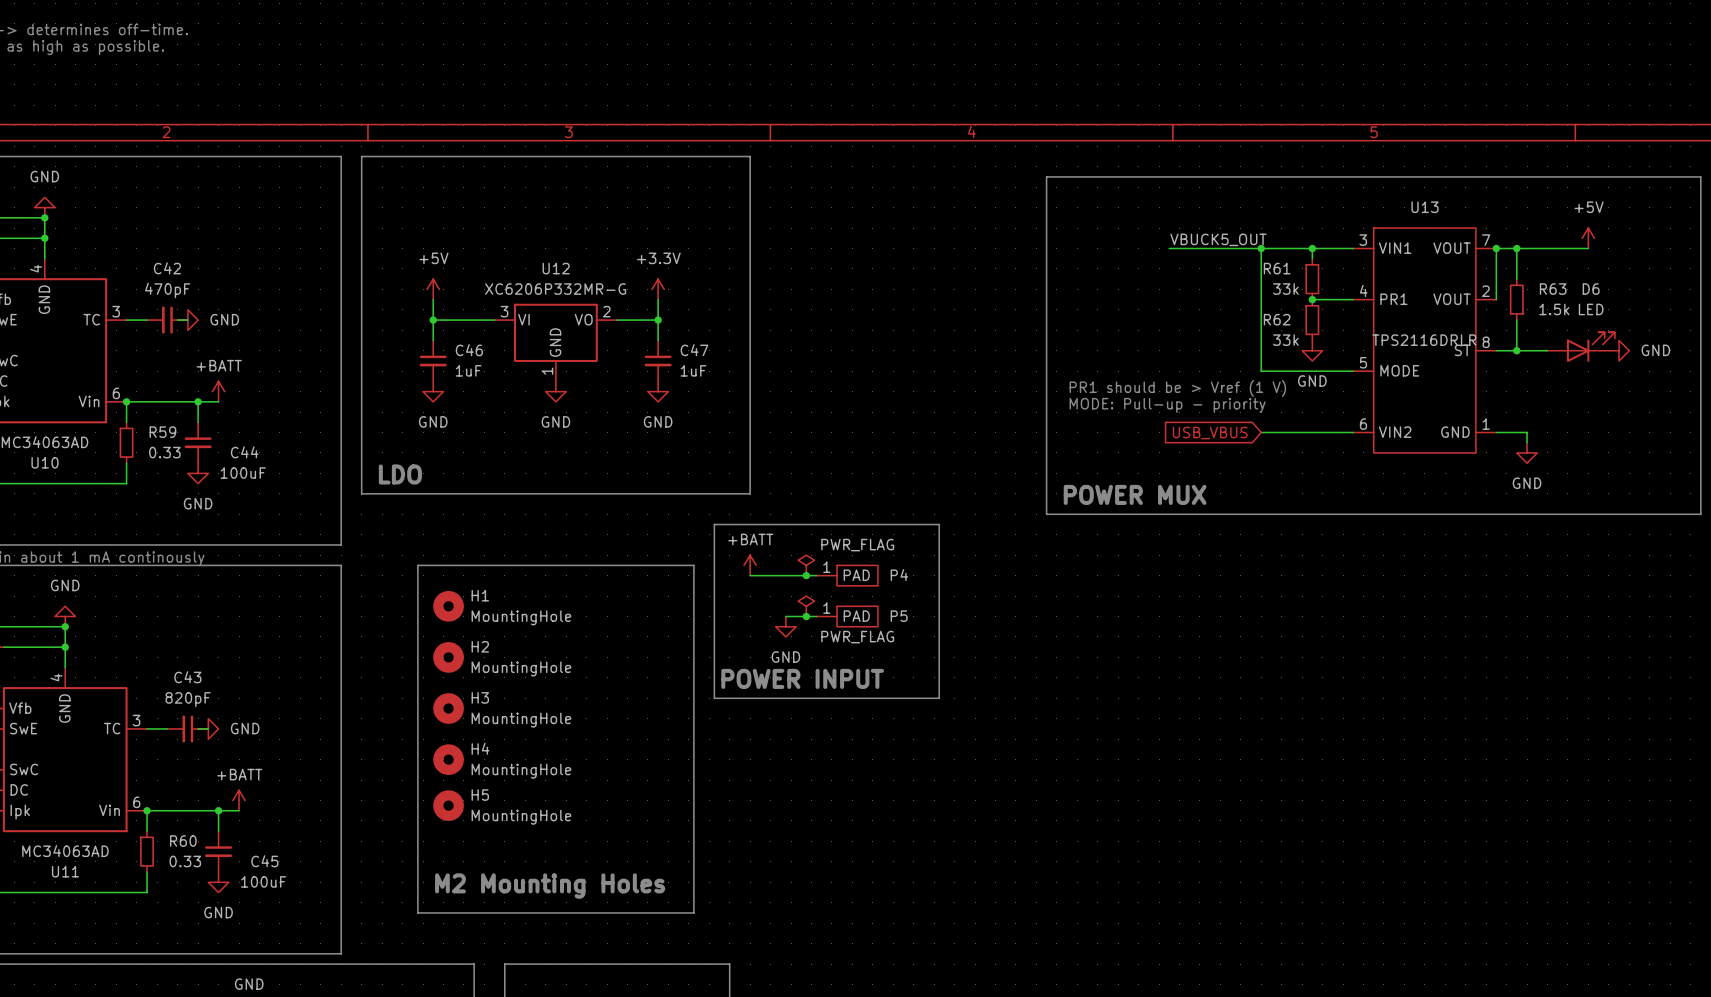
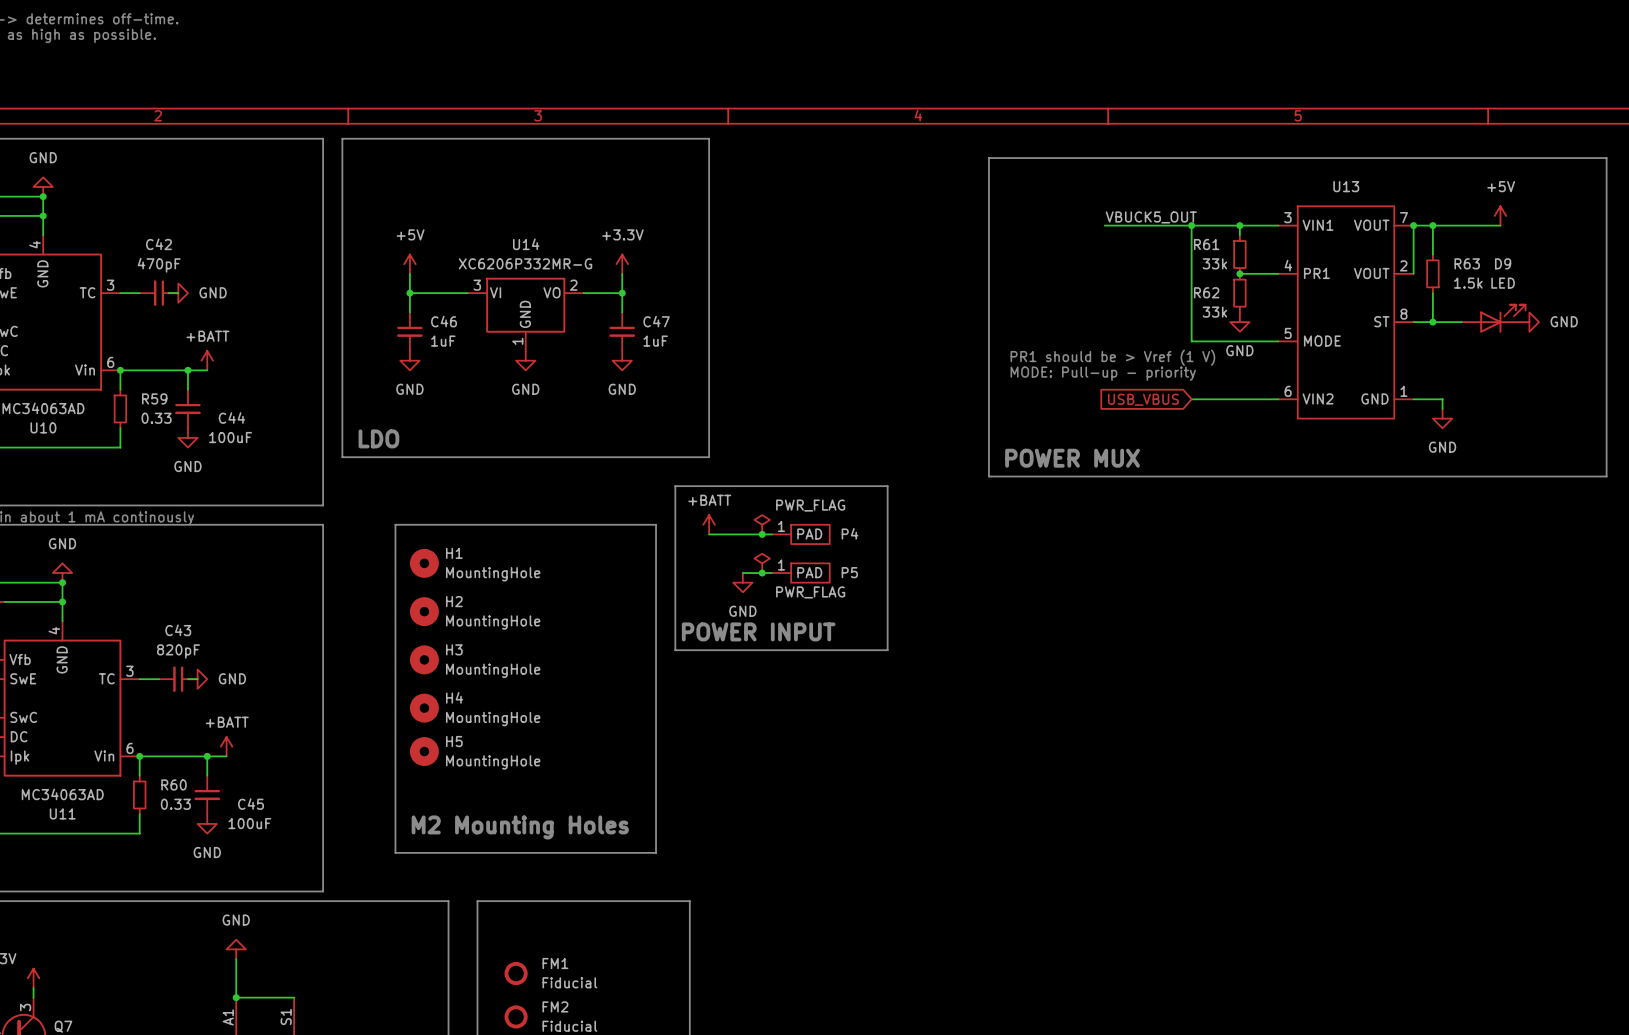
U12 name: U12 (556, 268) -> U14 (526, 244)
D6 name: D6 (1591, 289) -> D9 (1503, 263)
U13 value: TPS2116DRLR (1424, 340) -> none

